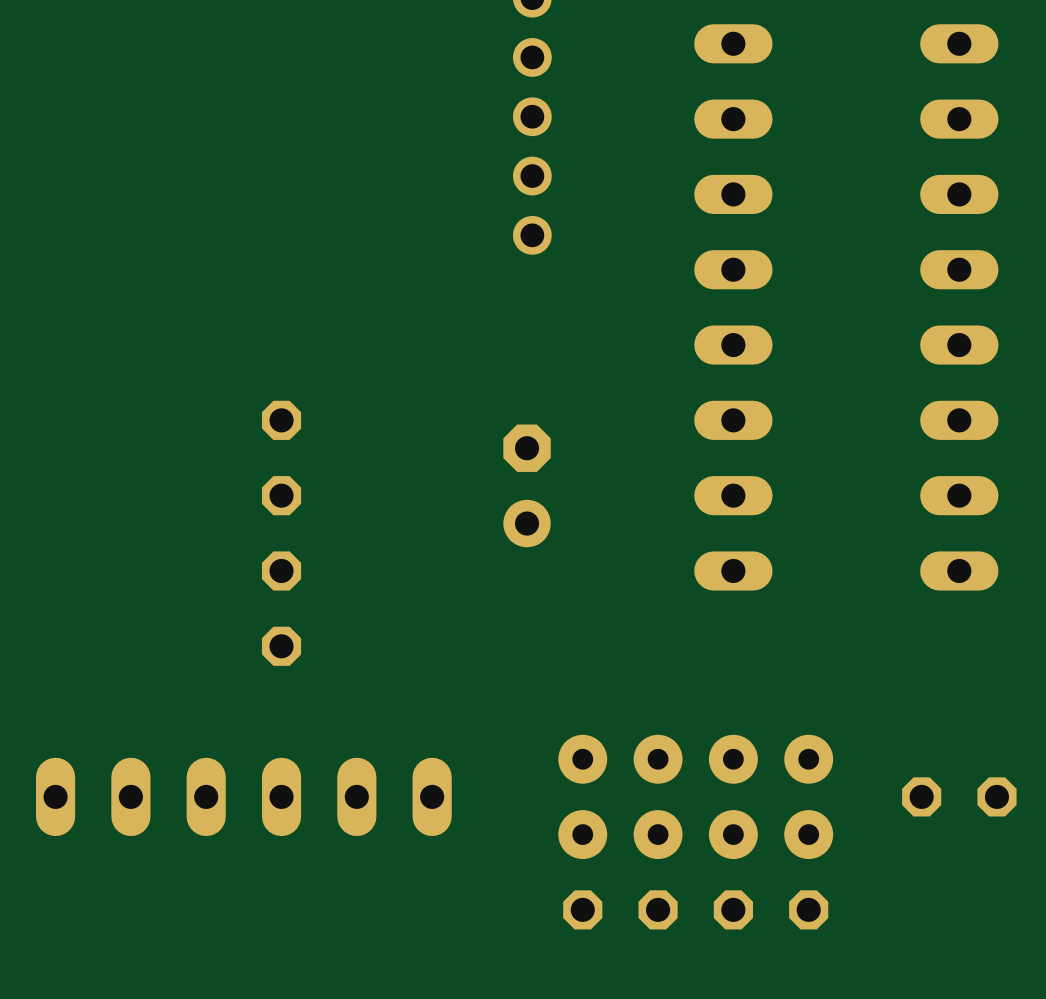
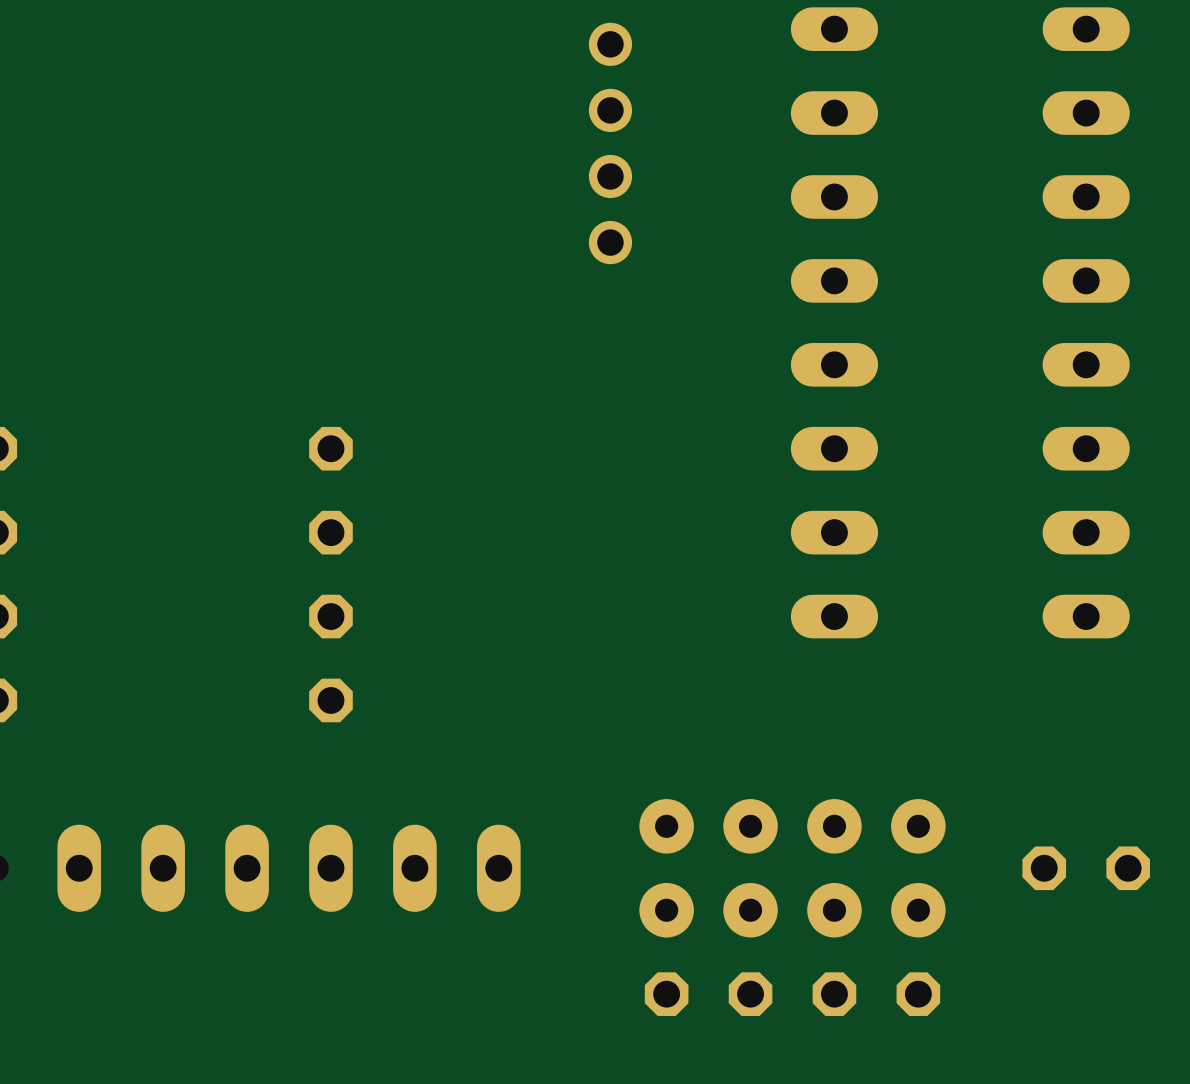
part: (527, 485) -> none

